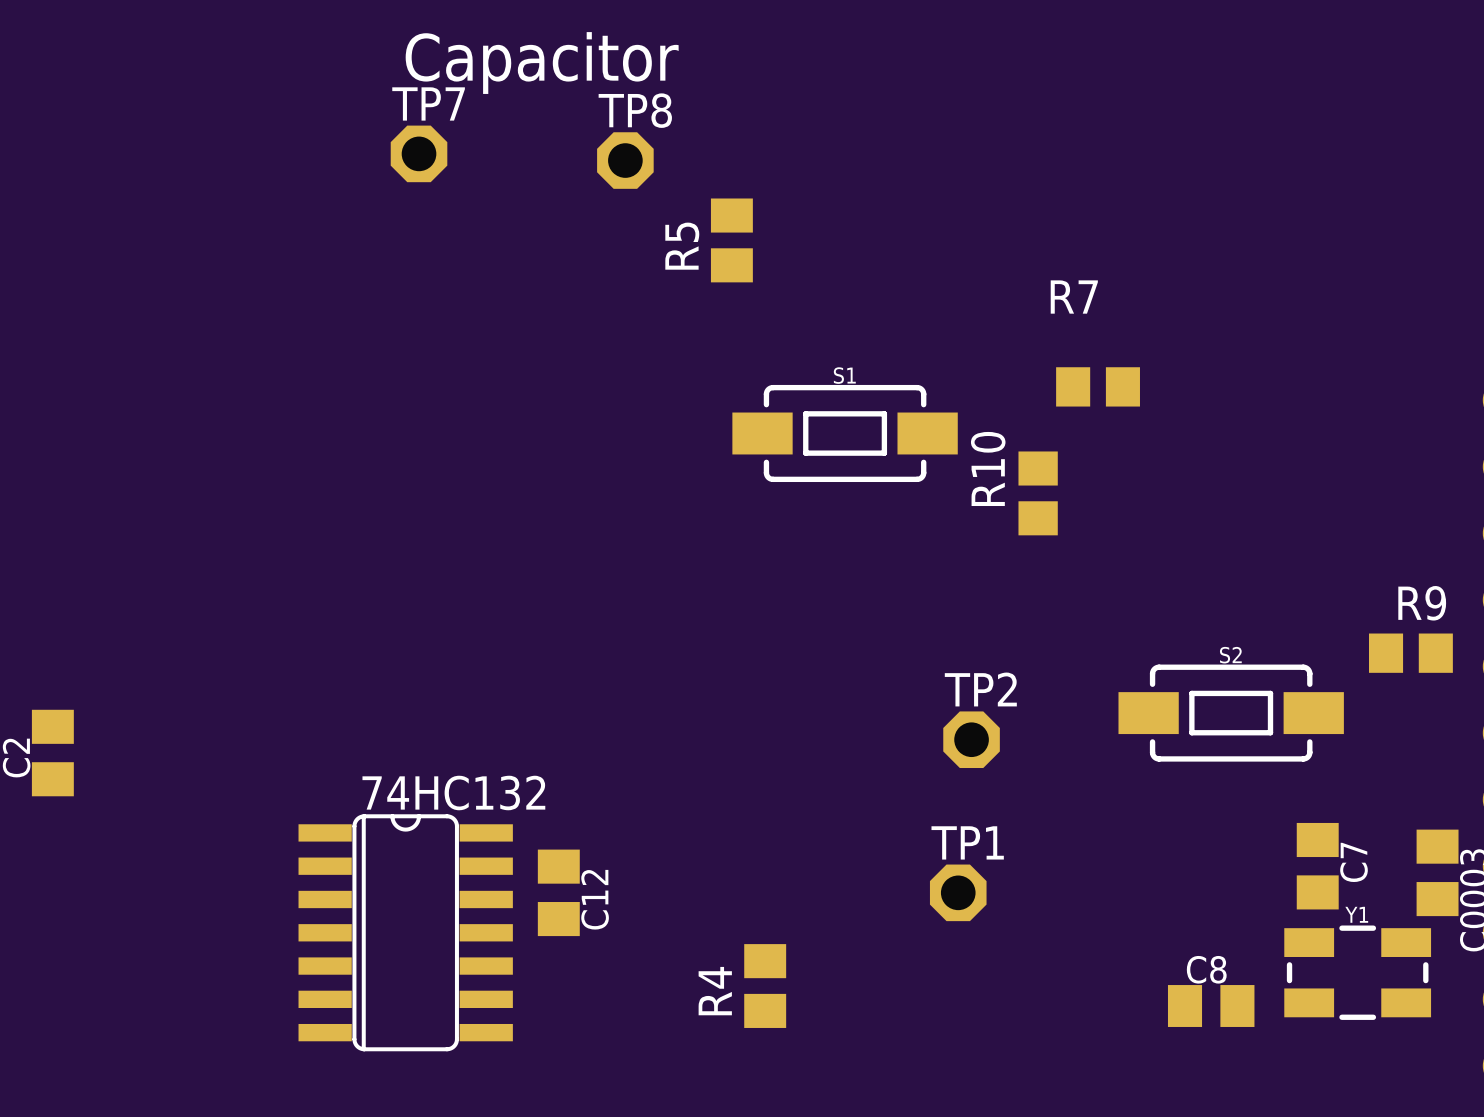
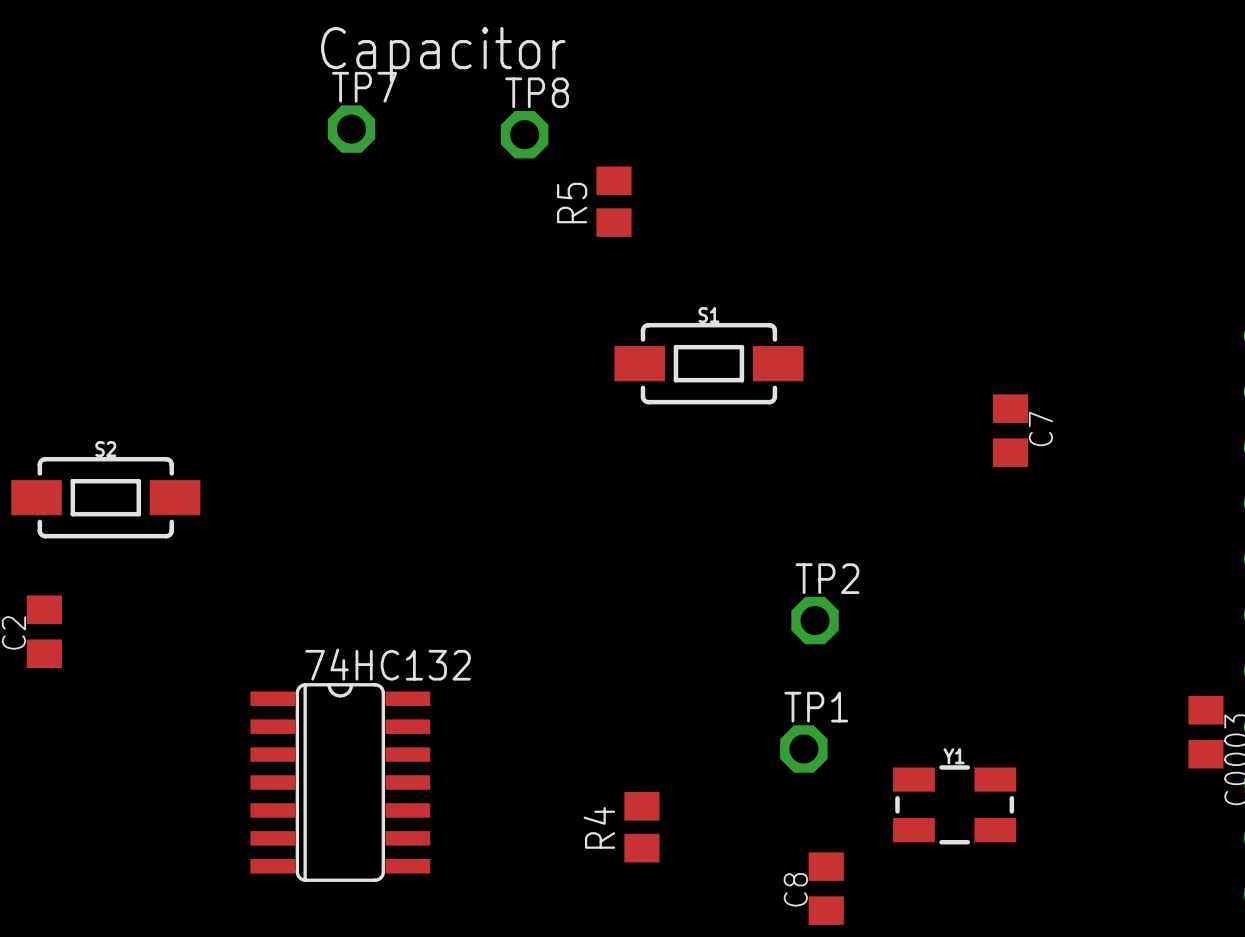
R7: (1098, 386) -> none
R10: (1038, 493) -> none
R9: (1410, 653) -> none
S2 position: (1231, 713) -> (105, 497)
C7 position: (1317, 866) -> (1010, 430)
C12: (558, 892) -> none
Y1 position: (1357, 972) -> (954, 804)
C8 rotation: 0° (1211, 1006) -> 90° clockwise (826, 888)
C8 position: (1211, 1006) -> (826, 888)

